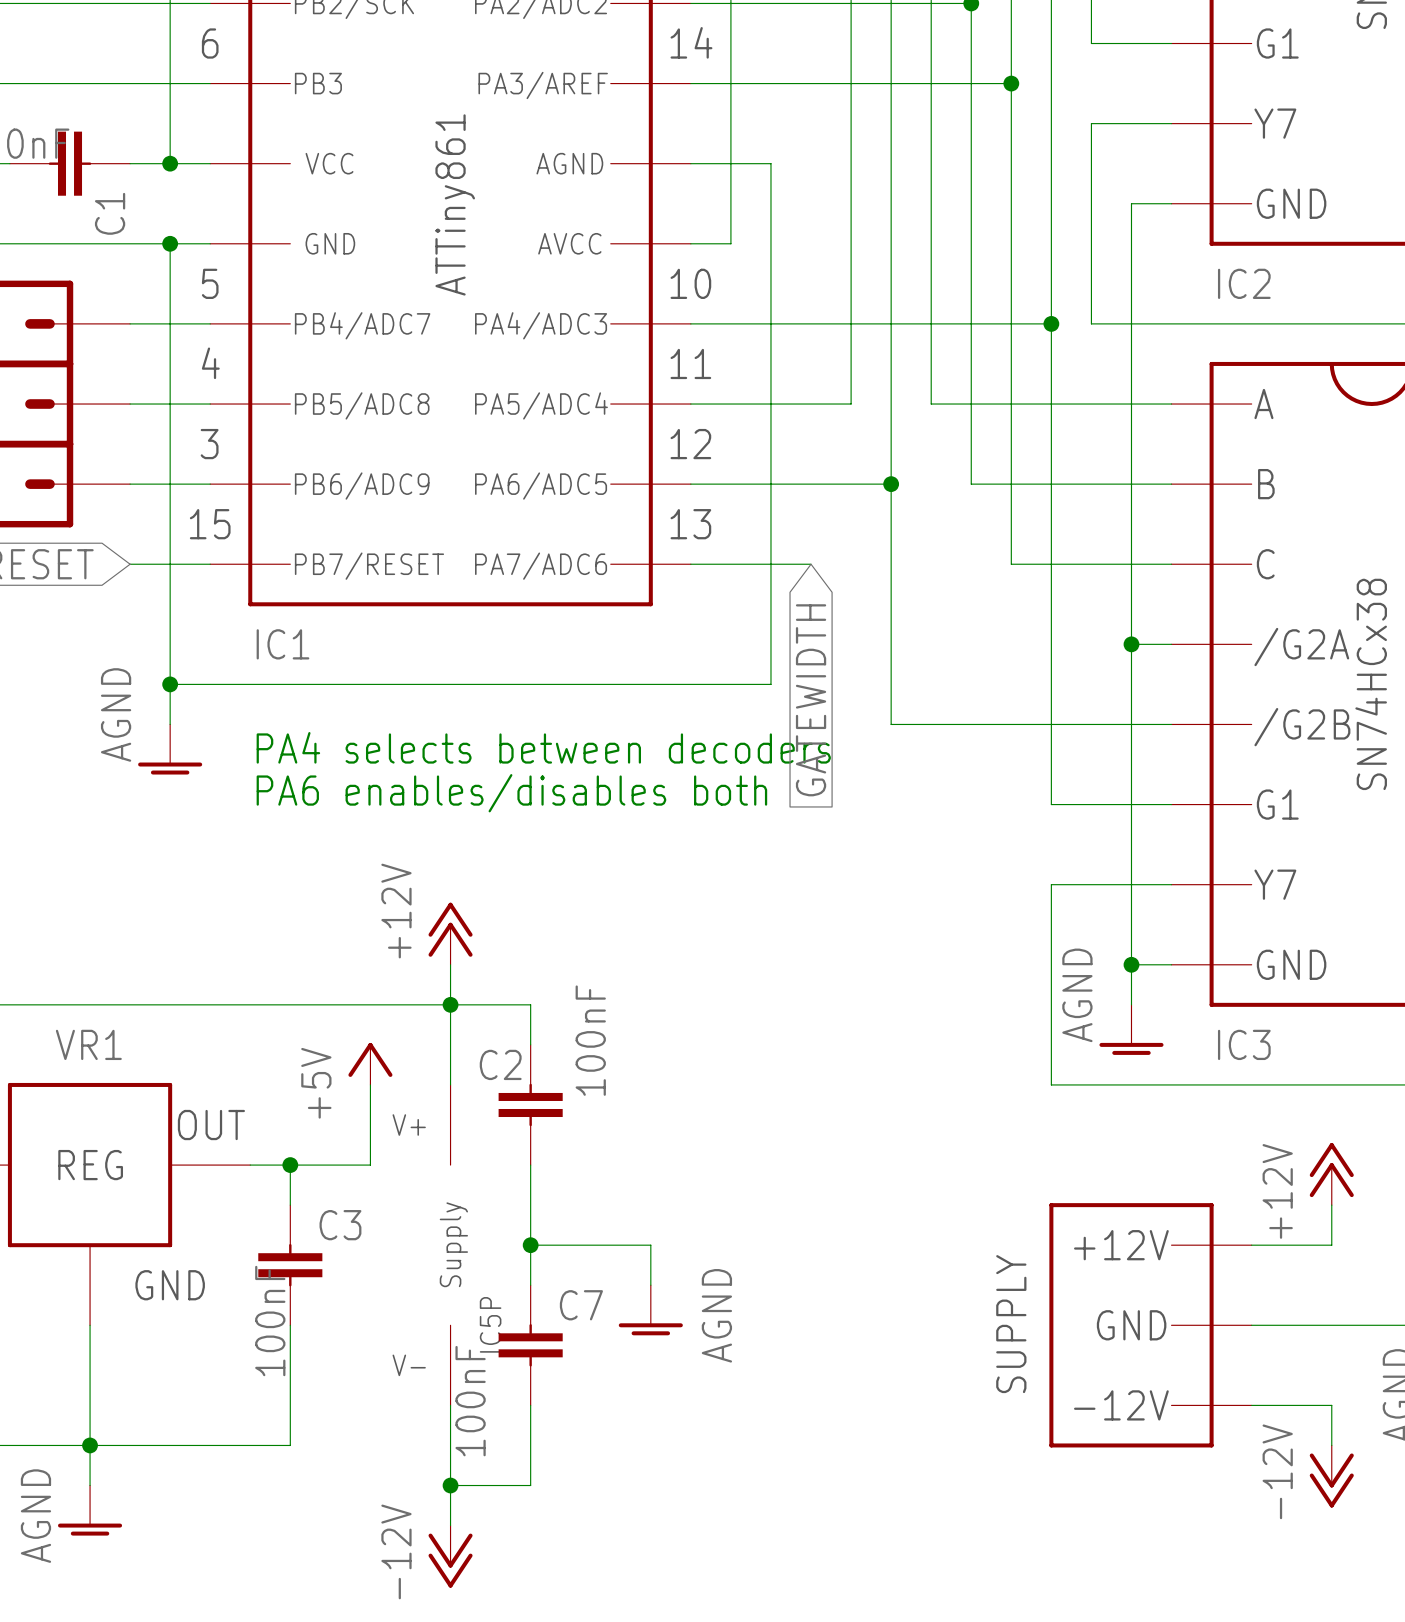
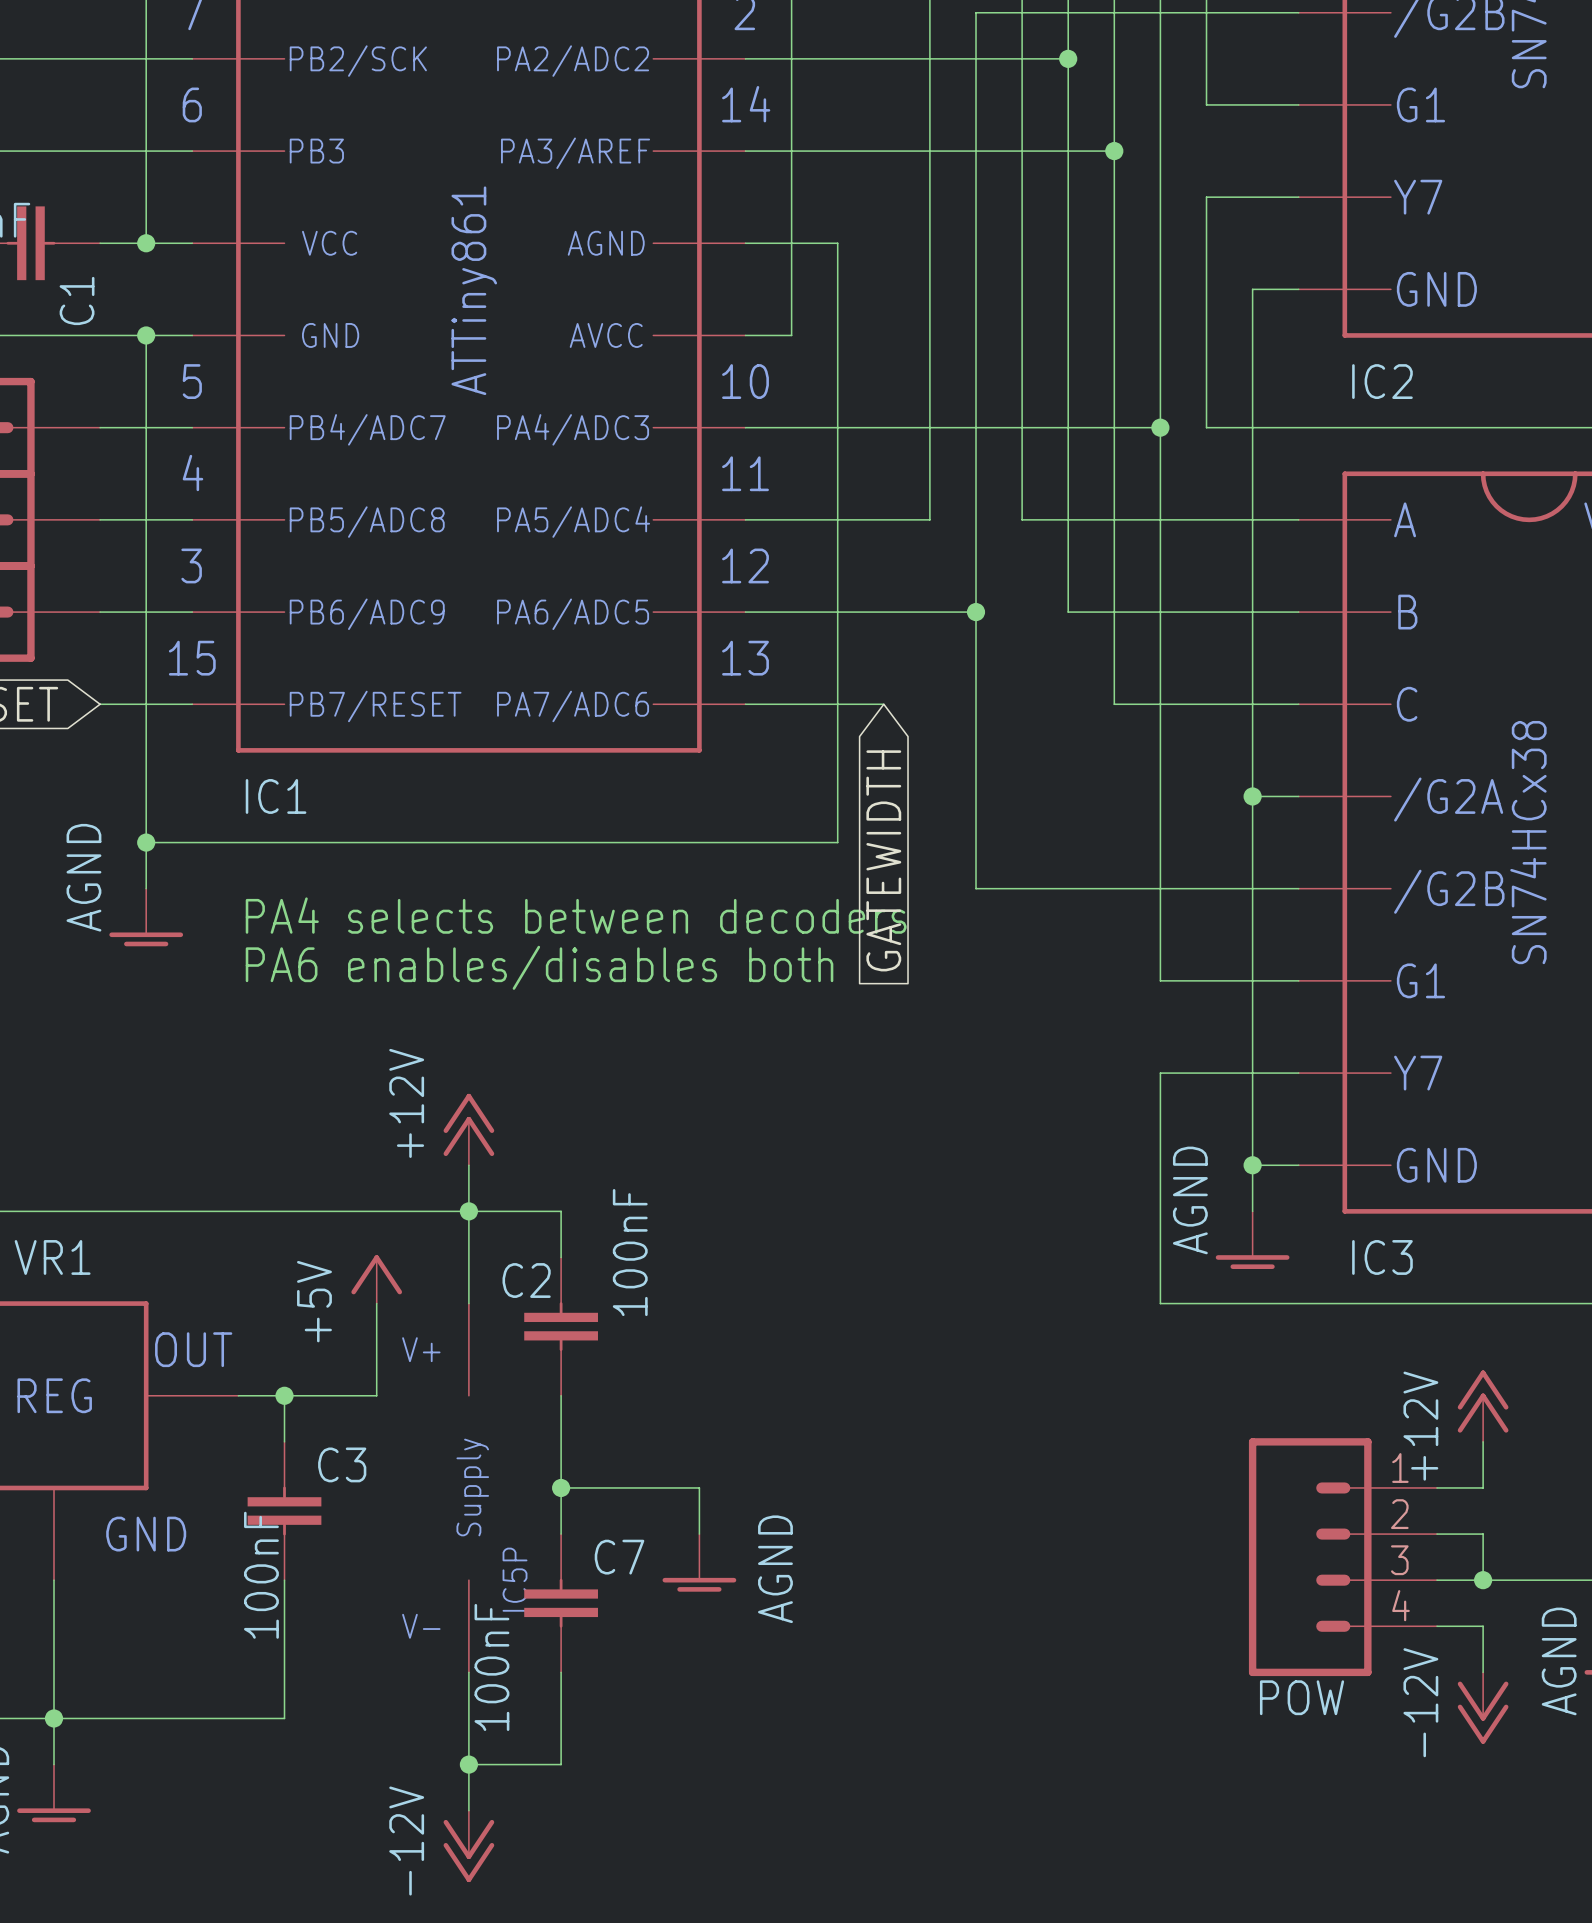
wire: none -> (1437, 1534) (1483, 1534) (1483, 1580)
POW: none -> (1342, 1557)
part: (1150, 1325) -> none
junction: none -> (1483, 1580)
wire: none -> (1437, 1626) (1483, 1626) (1483, 1672)
wire: (1251, 1405) (1331, 1405) (1331, 1445) -> none
power symbol position: -12V (1331, 1476) -> -12V (1483, 1708)

